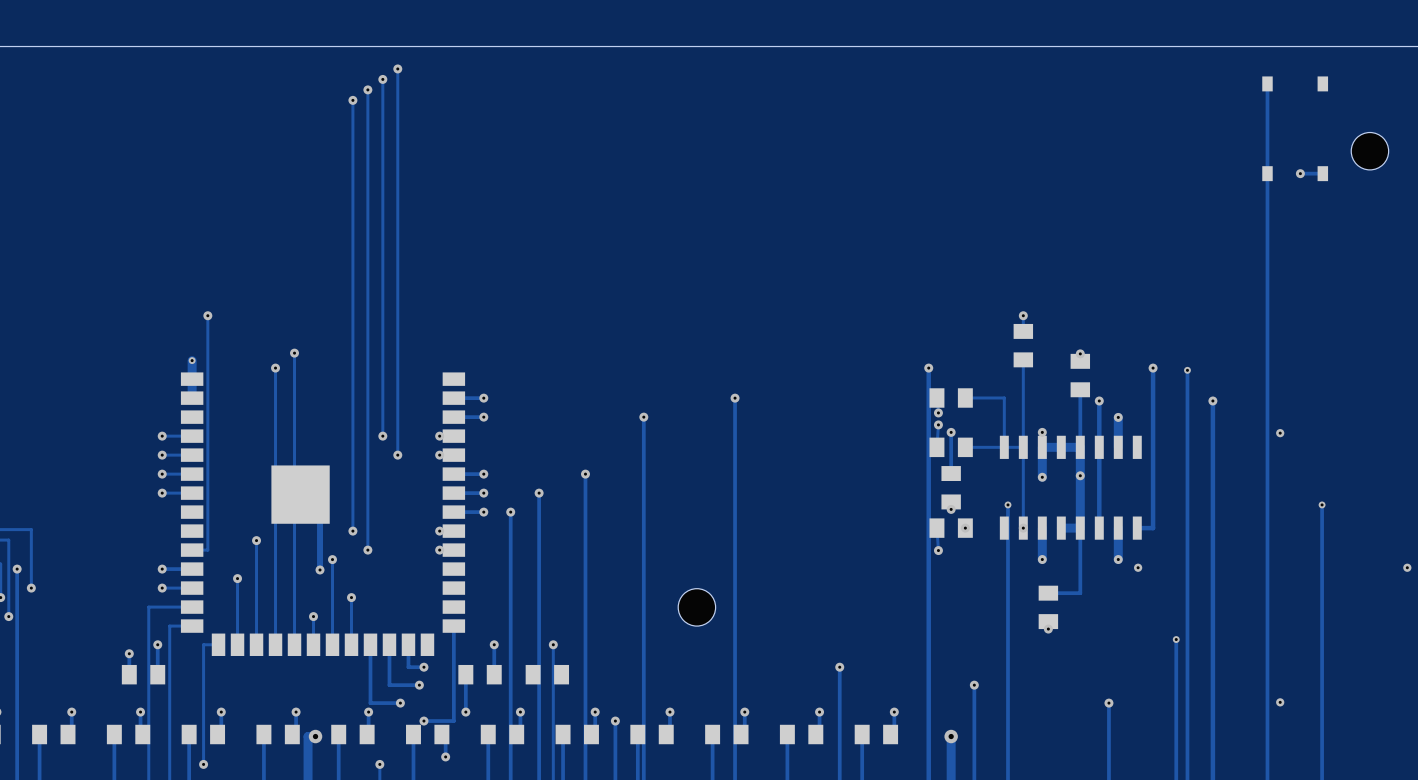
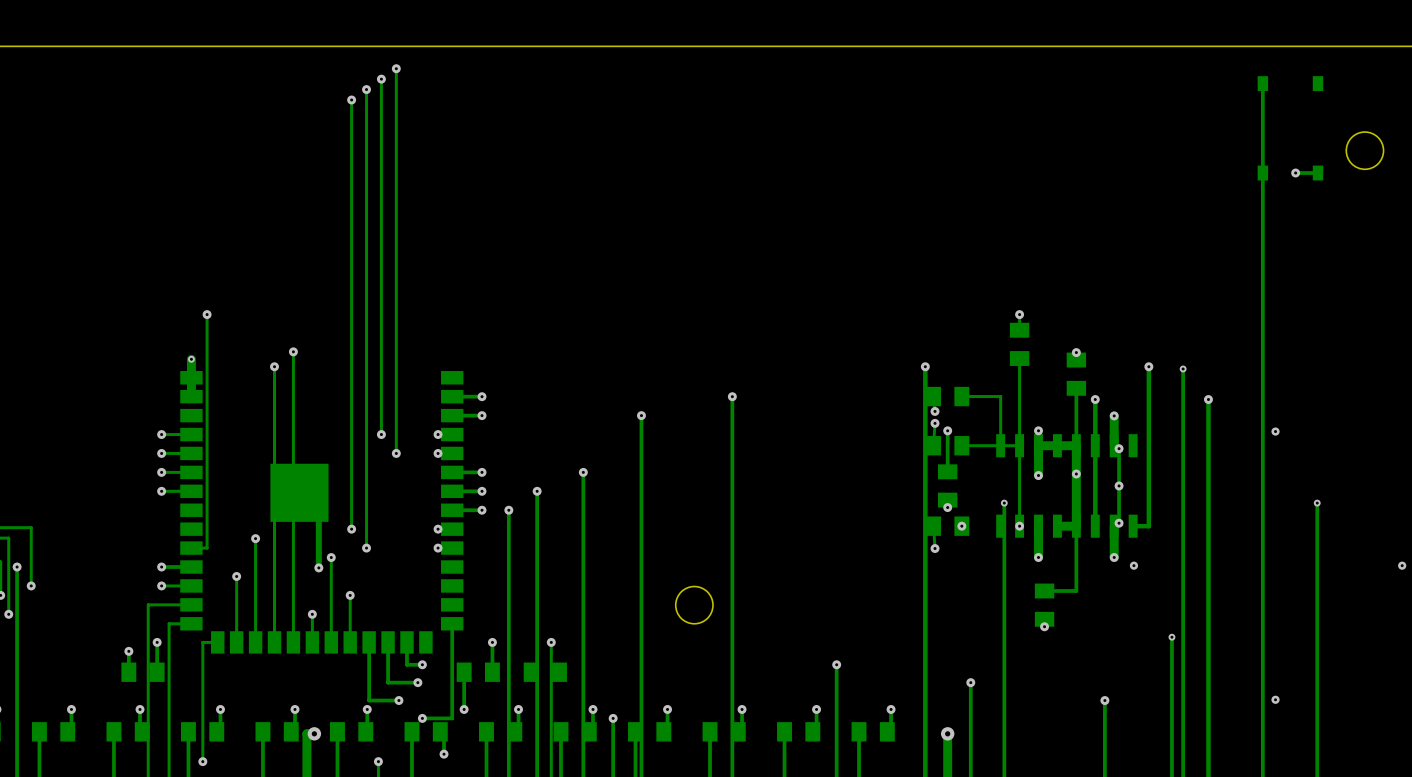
track: none -> (1119, 448) (1119, 523)
via: none -> (1119, 448)
via: none -> (1119, 485)
via: none -> (1119, 523)

